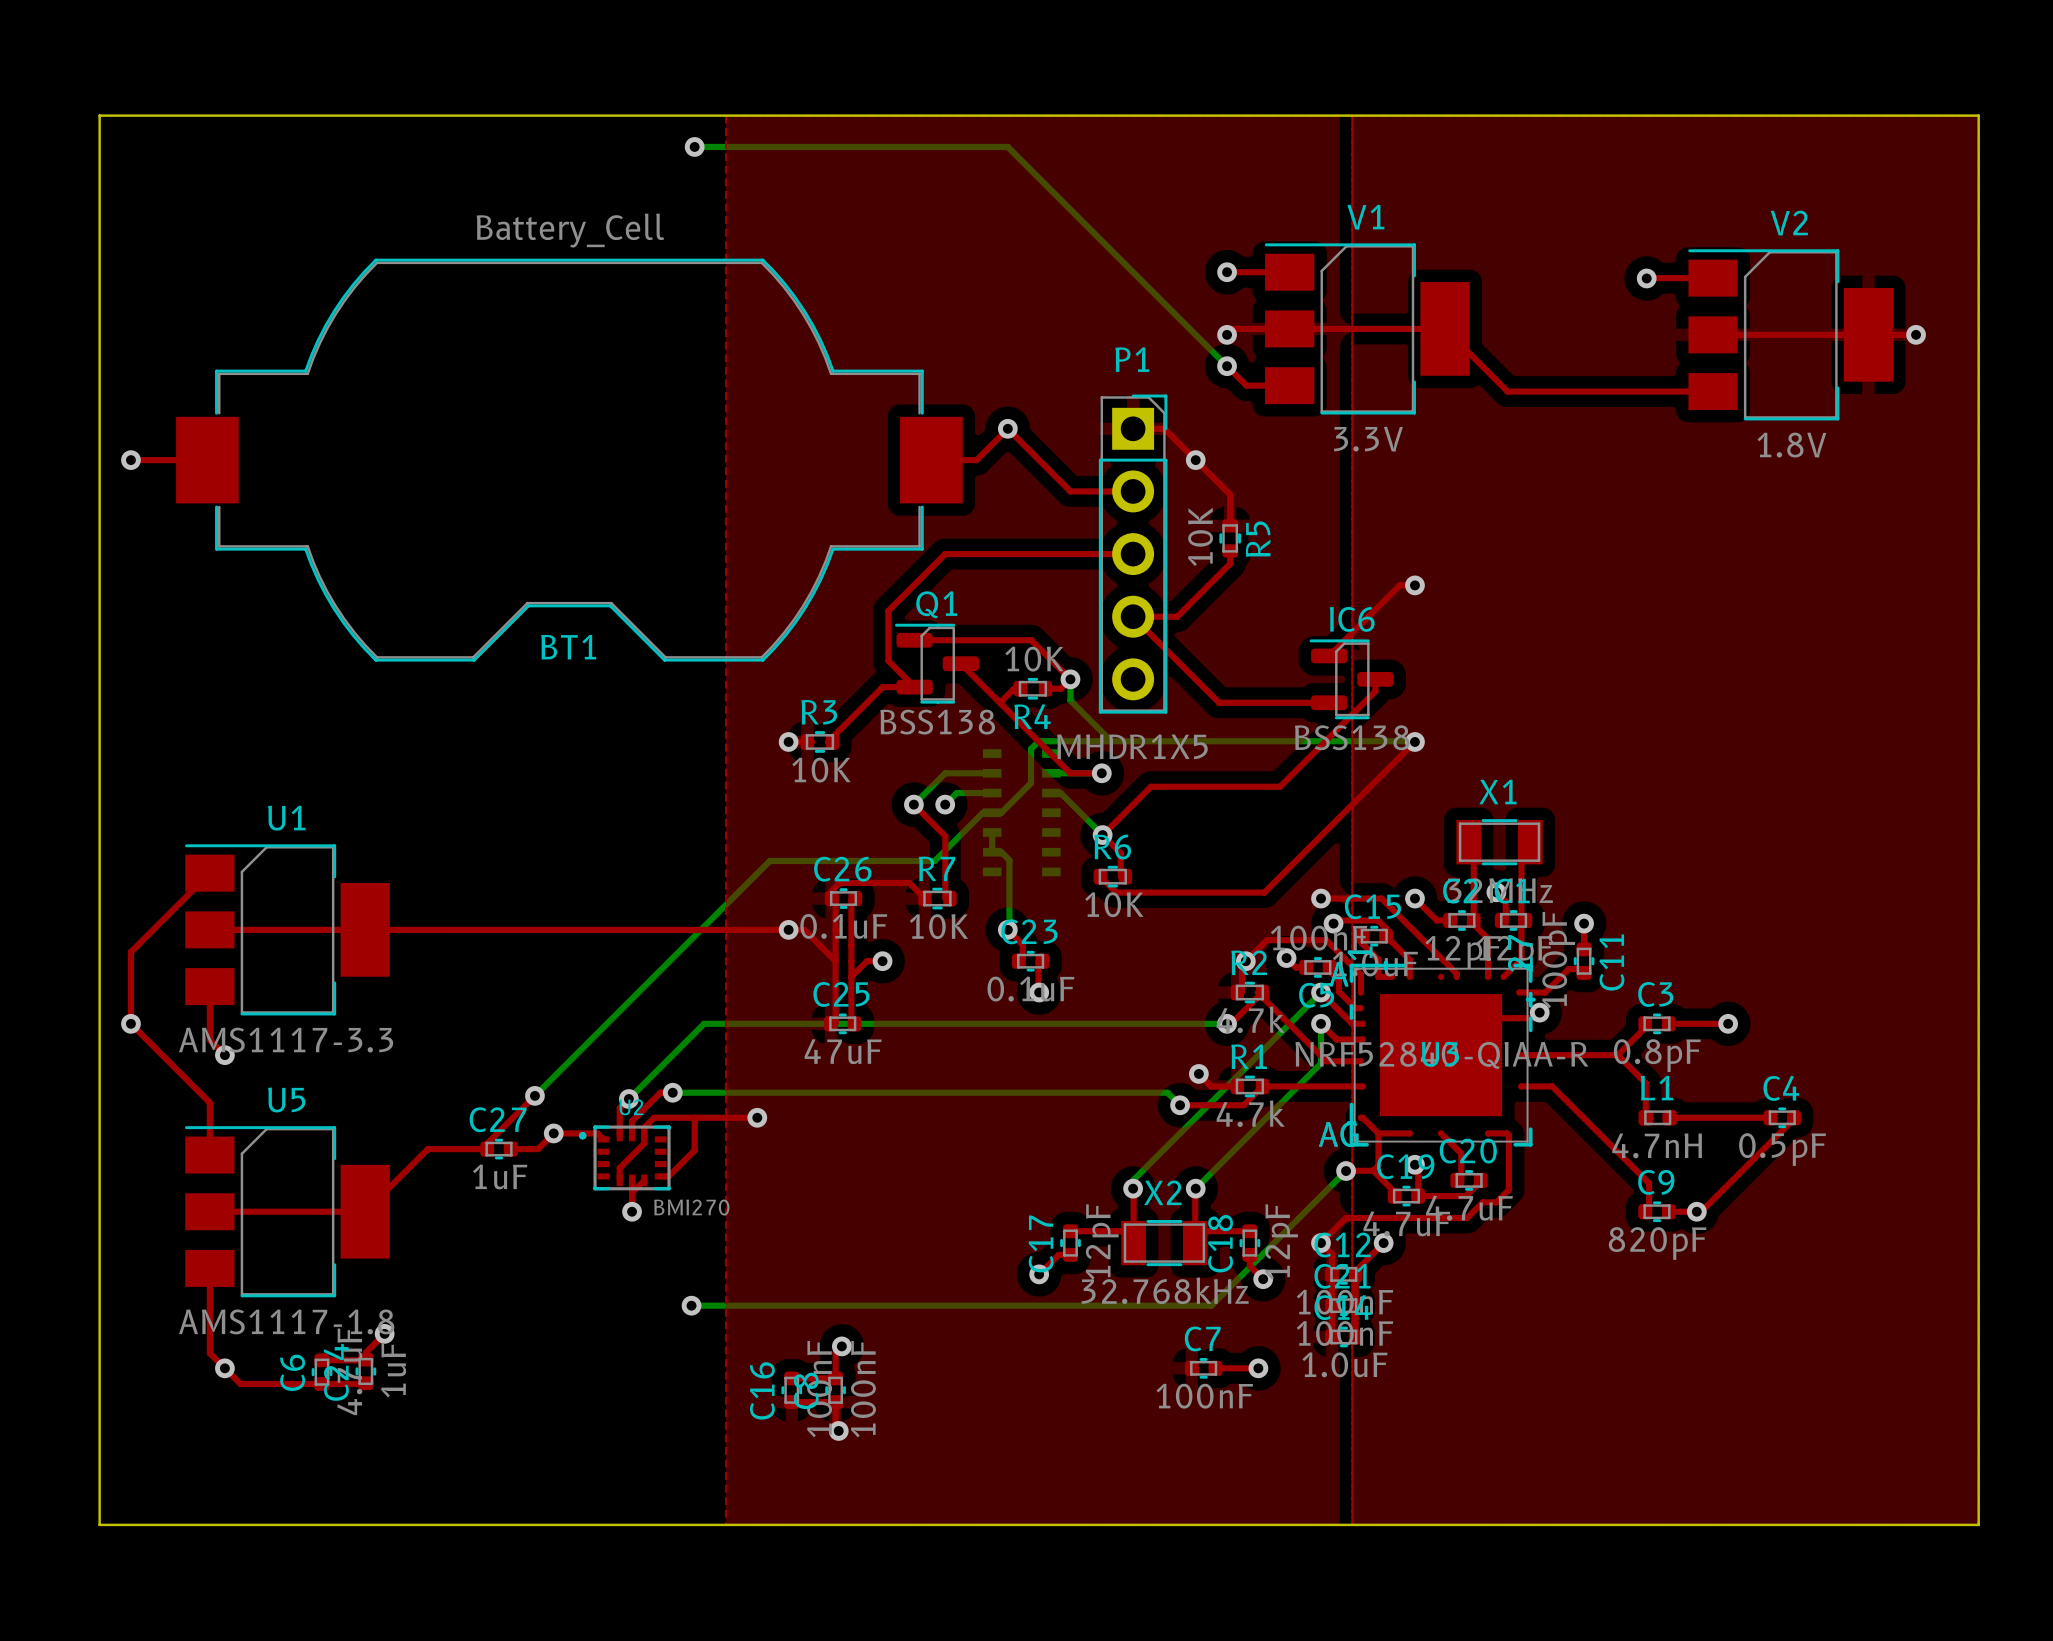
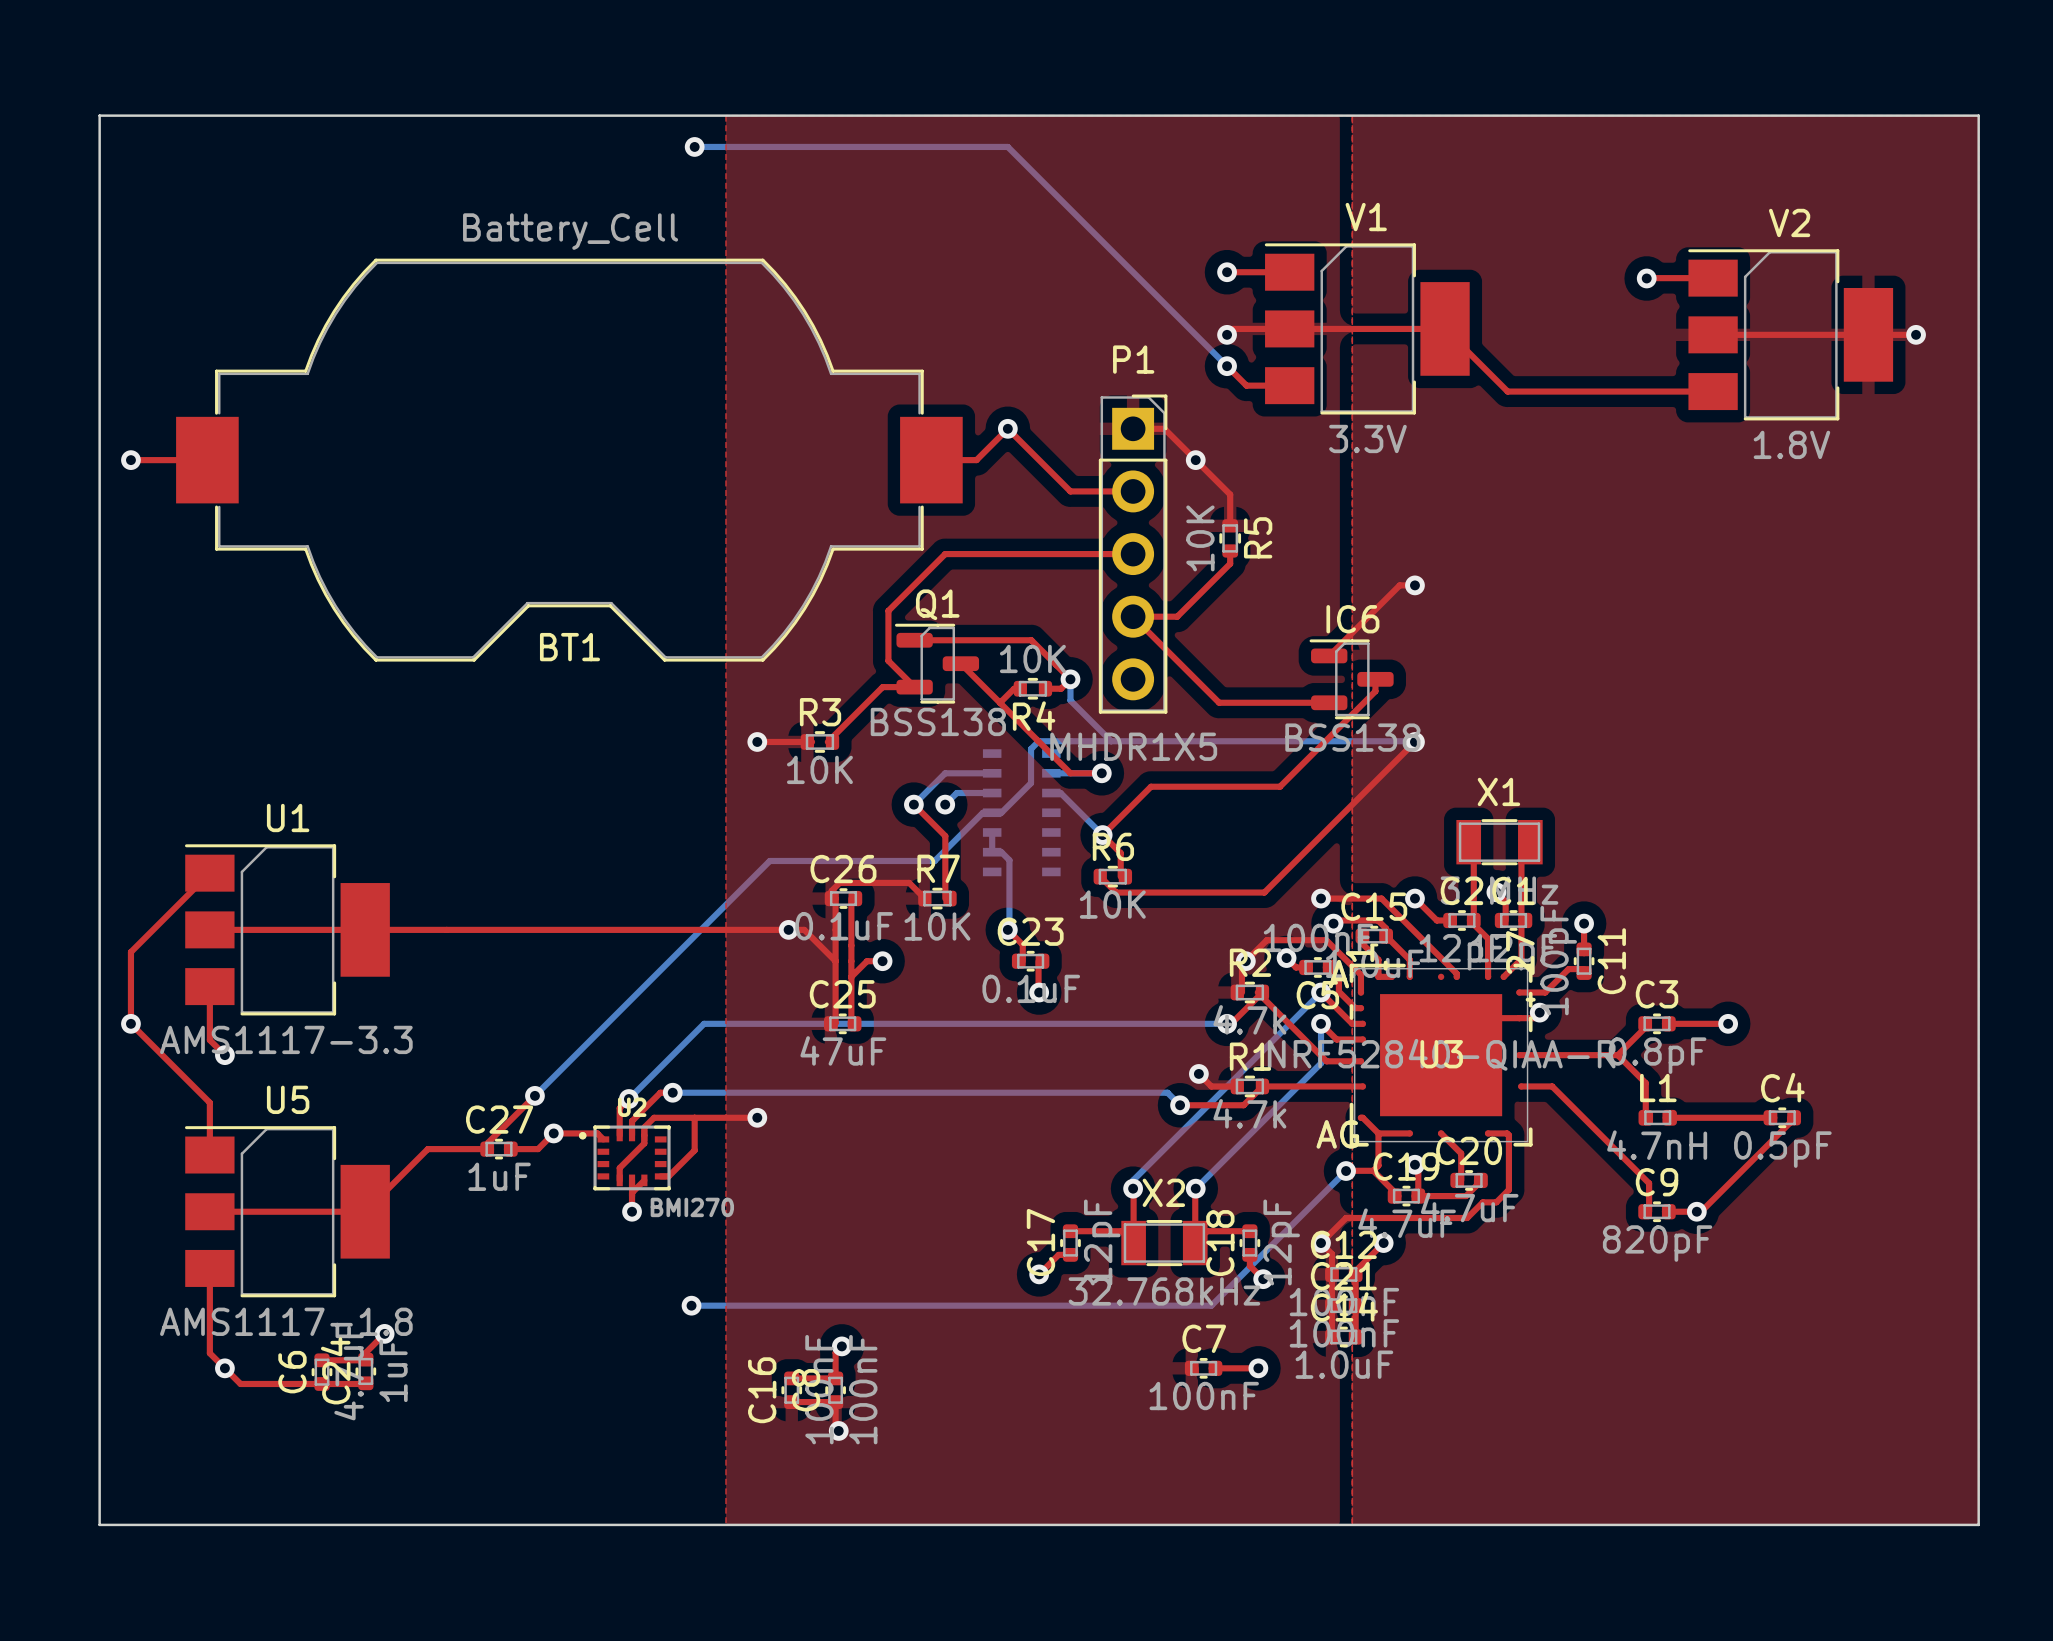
top track: none -> (757, 741) (788, 741)
via position: (788, 741) -> (757, 741)

